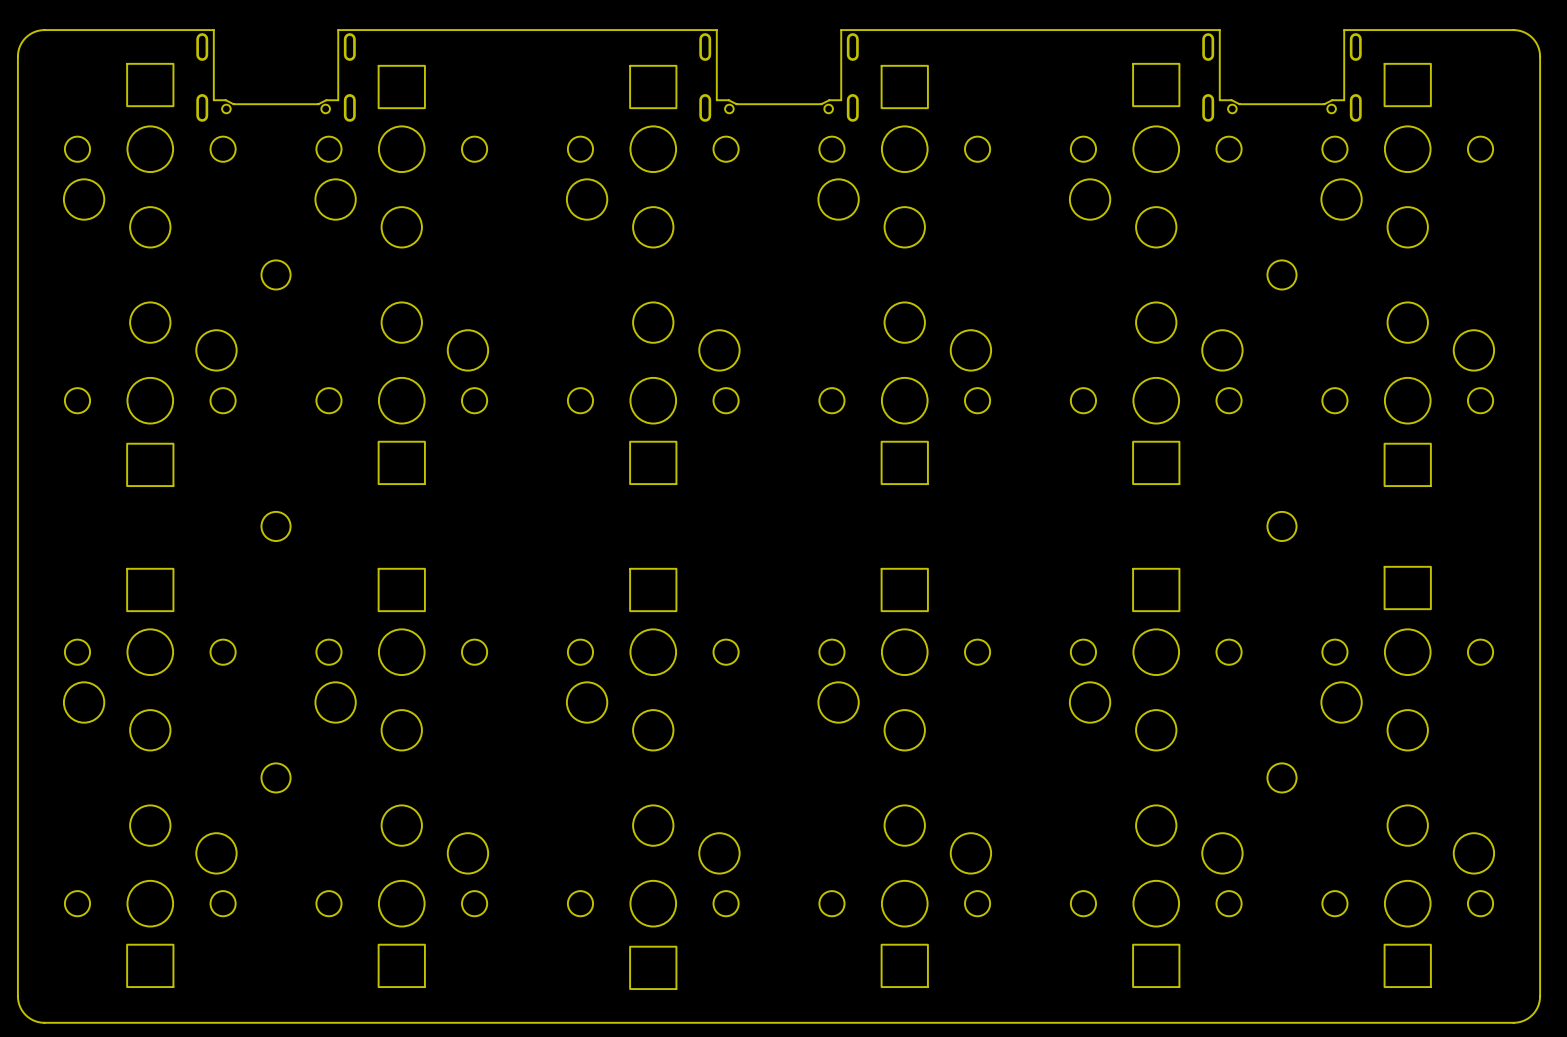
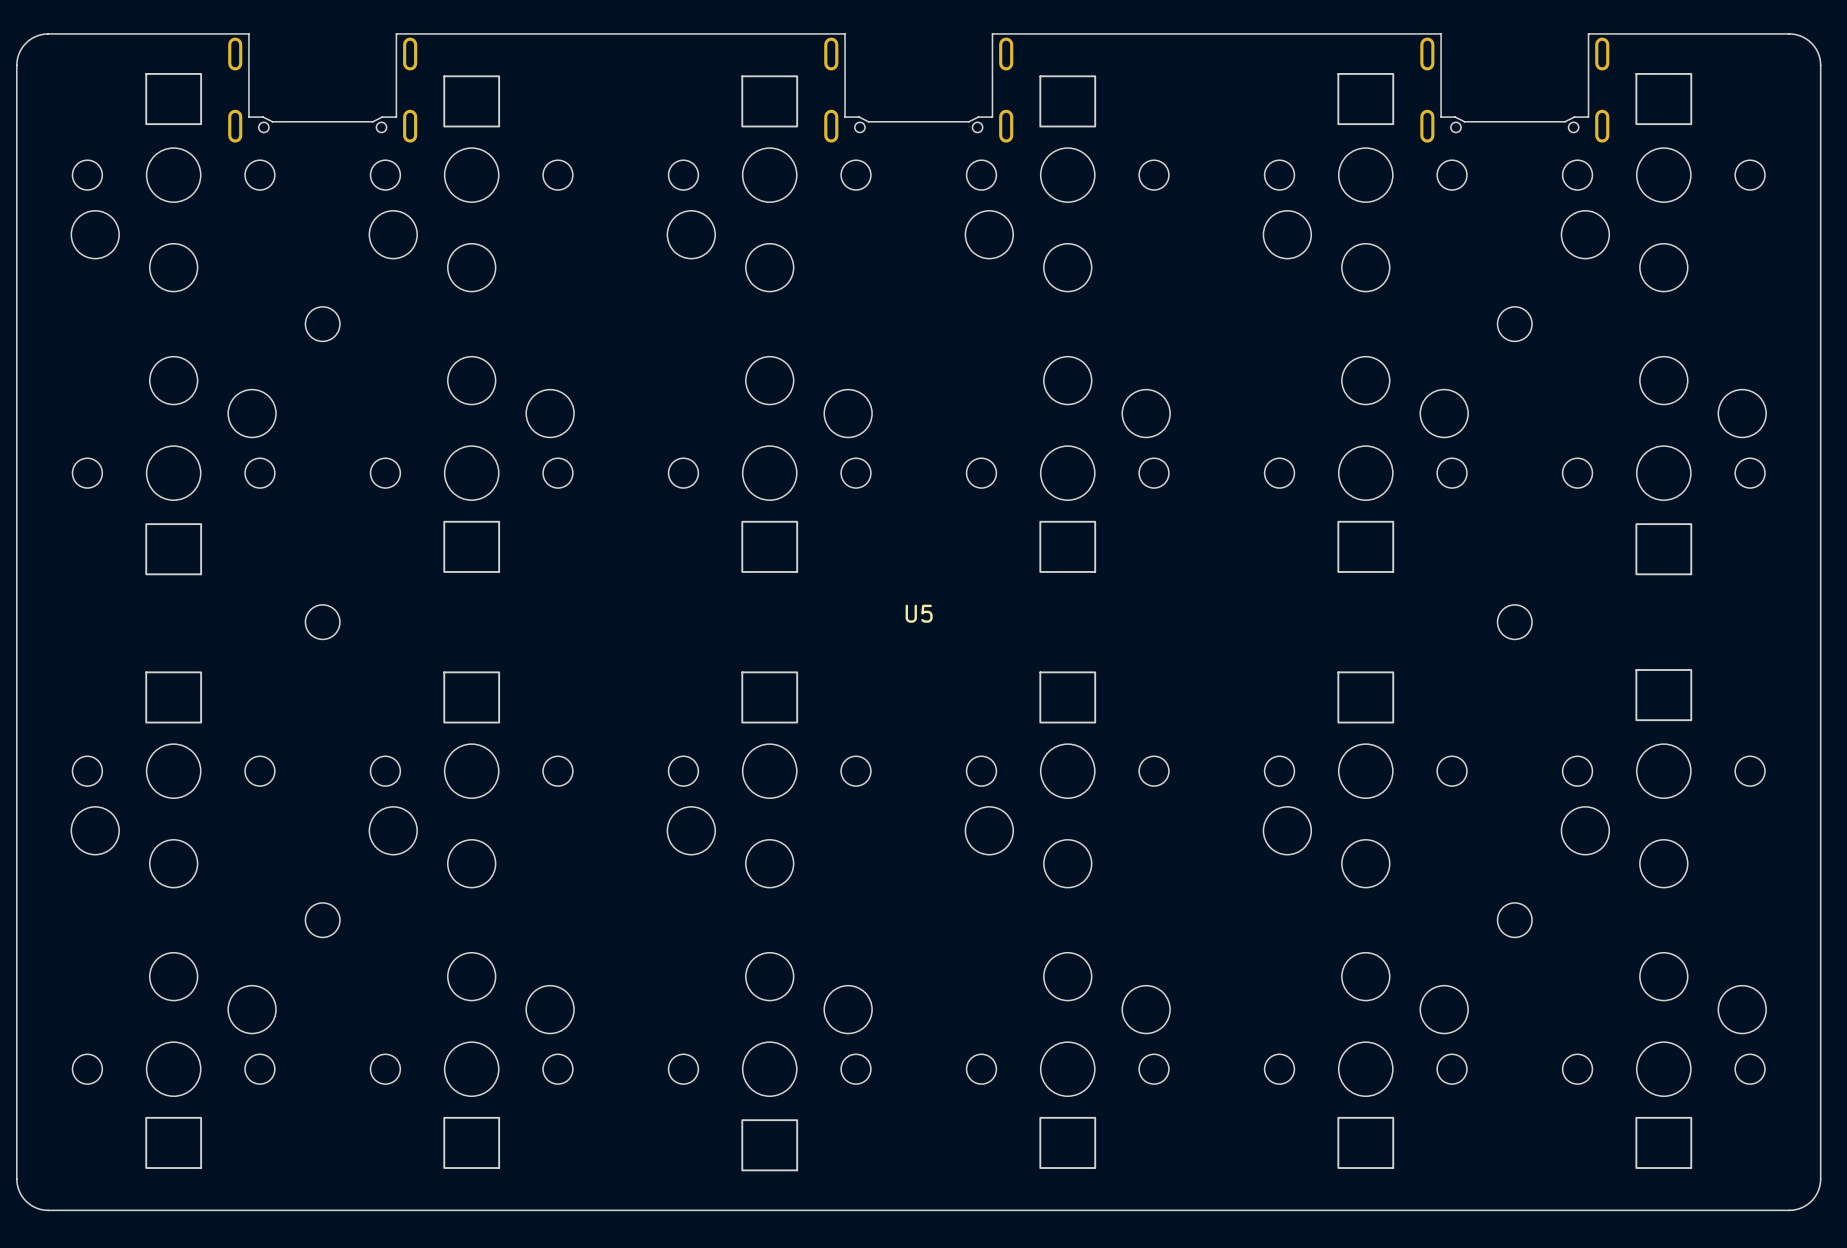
U5: none -> (919, 613)

